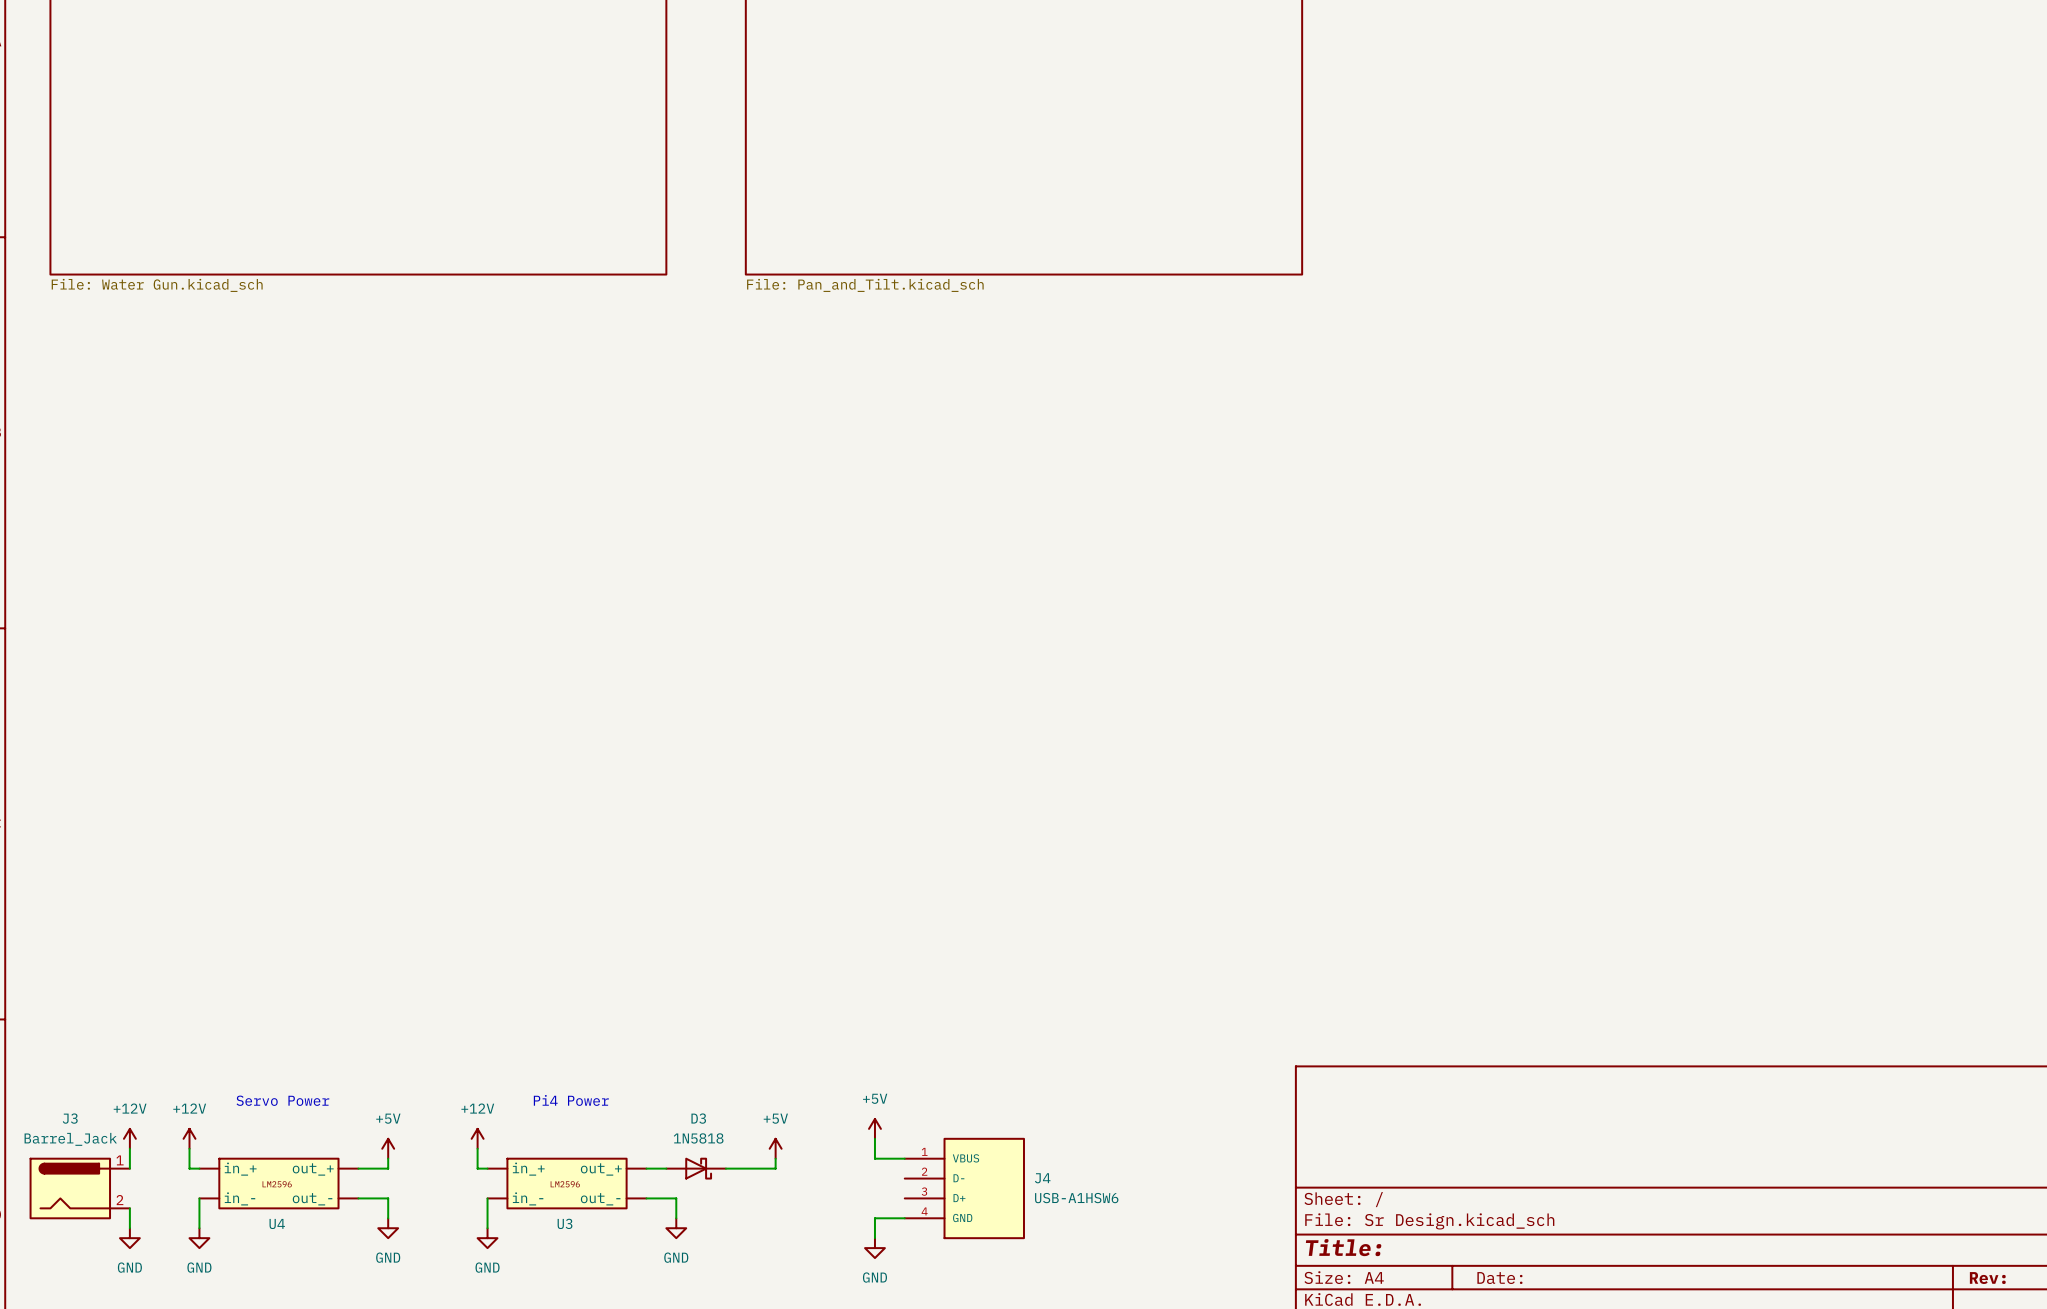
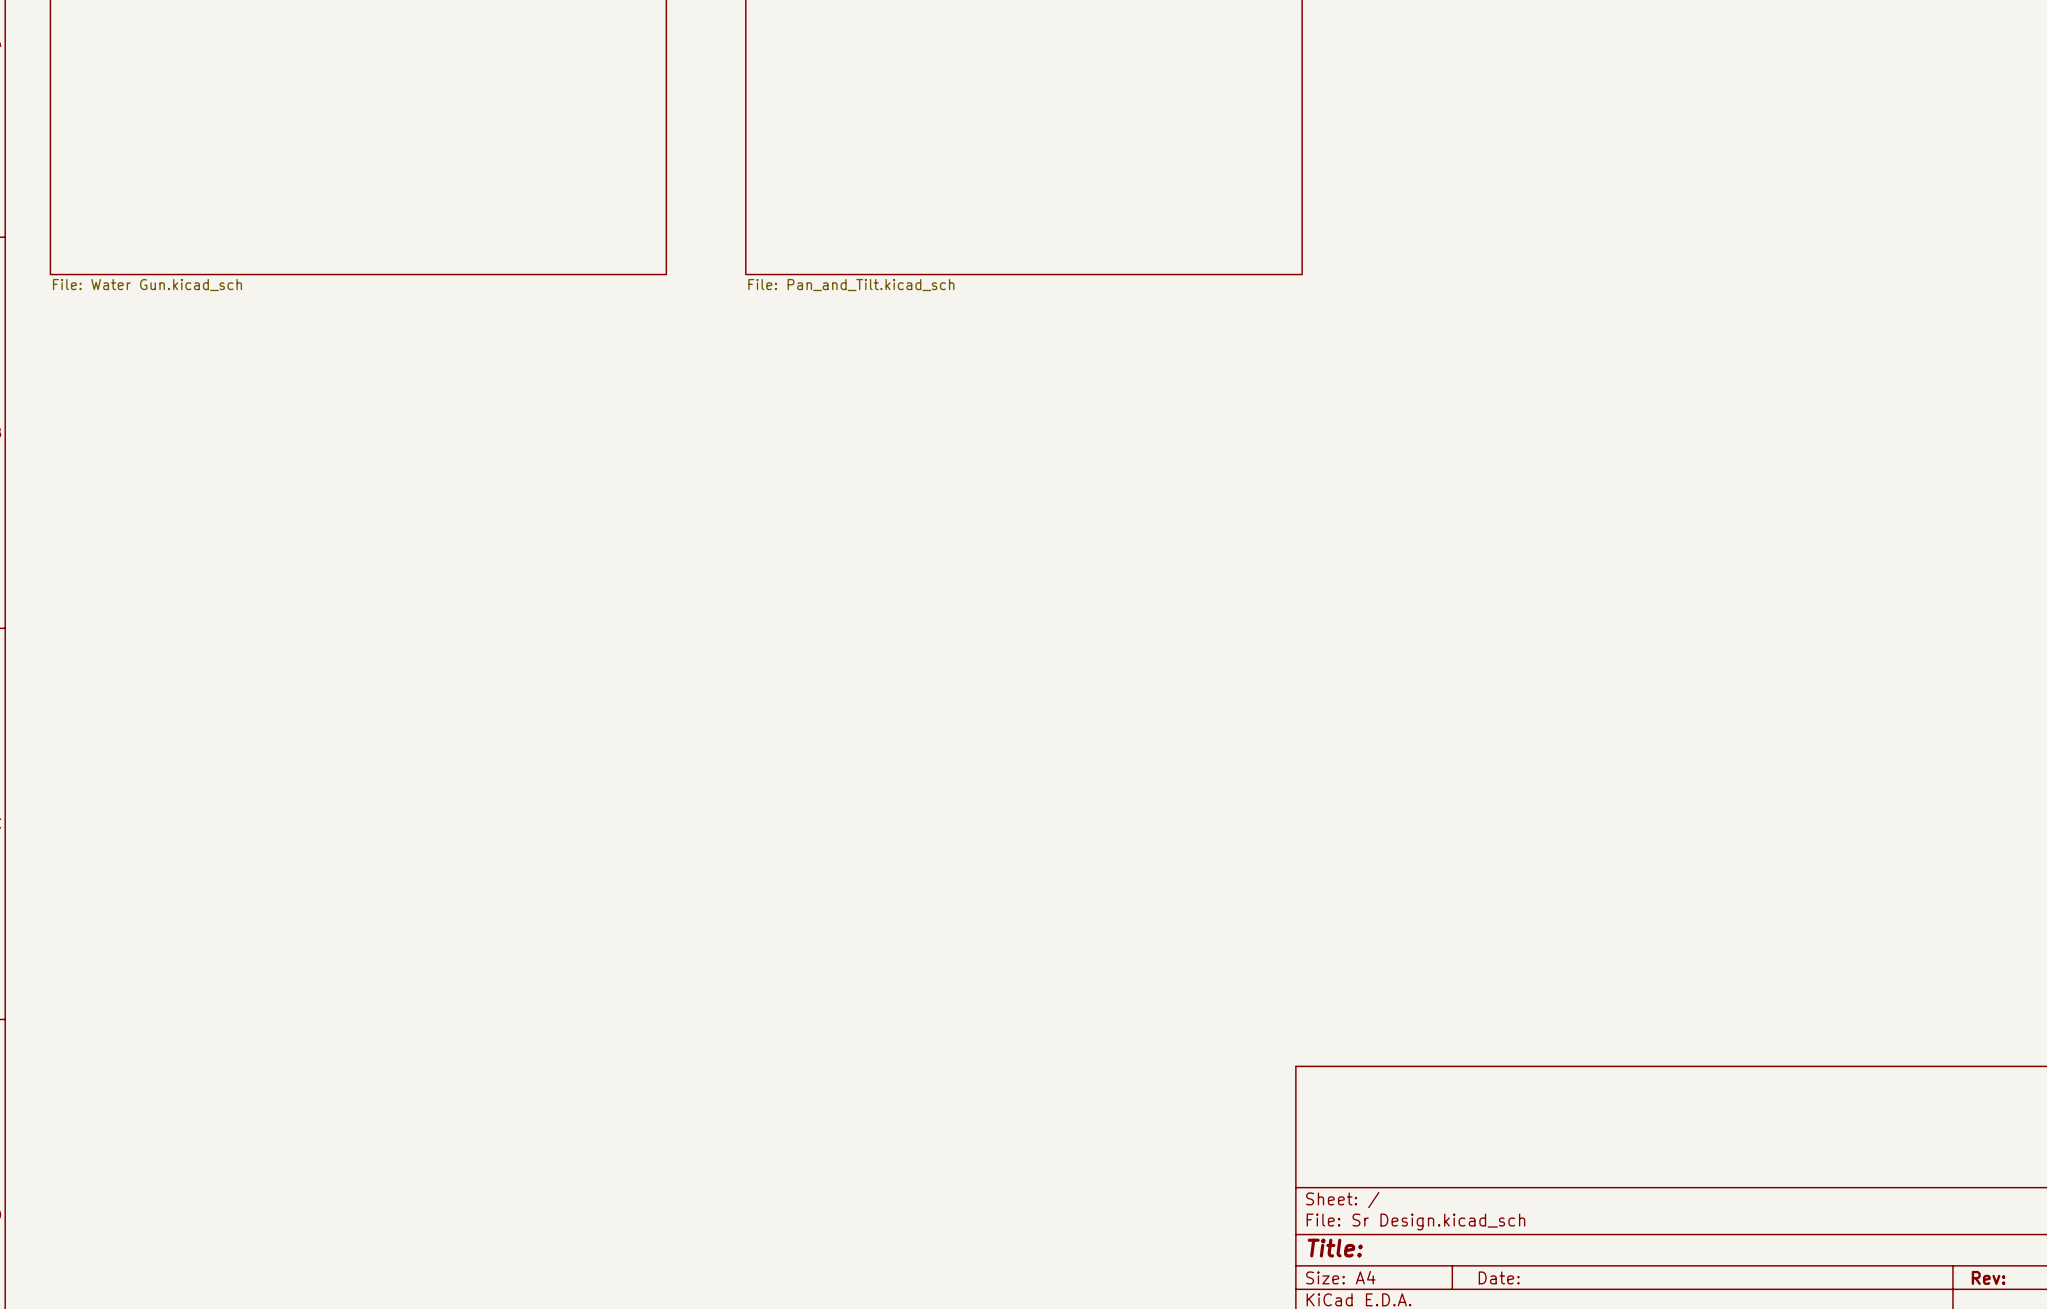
text: Servo Power (282, 1100) -> none
text: Pi4 Power (571, 1100) -> none
power symbol: +5V (874, 1128) -> none
power symbol: +12V (129, 1138) -> none
power symbol: +12V (189, 1138) -> none
power symbol: +12V (477, 1138) -> none
wire: (874, 1138) (874, 1158) (904, 1158) -> none
wire: (129, 1148) (129, 1168) -> none
wire: (189, 1148) (189, 1168) (199, 1168) -> none
power symbol: +5V (388, 1148) -> none
wire: (477, 1148) (477, 1168) (487, 1168) -> none
power symbol: +5V (775, 1148) -> none
wire: (388, 1158) (388, 1168) (358, 1168) -> none
wire: (775, 1158) (775, 1168) (725, 1168) -> none
wire: (646, 1168) (666, 1168) -> none
D3: 1N5818 (696, 1168) -> none
U4: (278, 1183) -> none
U3: (567, 1183) -> none
J3: Barrel_Jack (79, 1188) -> none
J4: USB-A1HSW6 (964, 1188) -> none
wire: (199, 1198) (199, 1228) -> none
wire: (358, 1198) (388, 1198) (388, 1218) -> none
wire: (487, 1198) (487, 1228) -> none
wire: (646, 1198) (676, 1198) (676, 1218) -> none
wire: (129, 1208) (129, 1228) -> none
wire: (904, 1218) (874, 1218) (874, 1238) -> none
power symbol: GND (388, 1228) -> none
power symbol: GND (676, 1228) -> none
power symbol: GND (129, 1238) -> none
power symbol: GND (199, 1238) -> none
power symbol: GND (487, 1238) -> none
power symbol: GND (874, 1248) -> none

